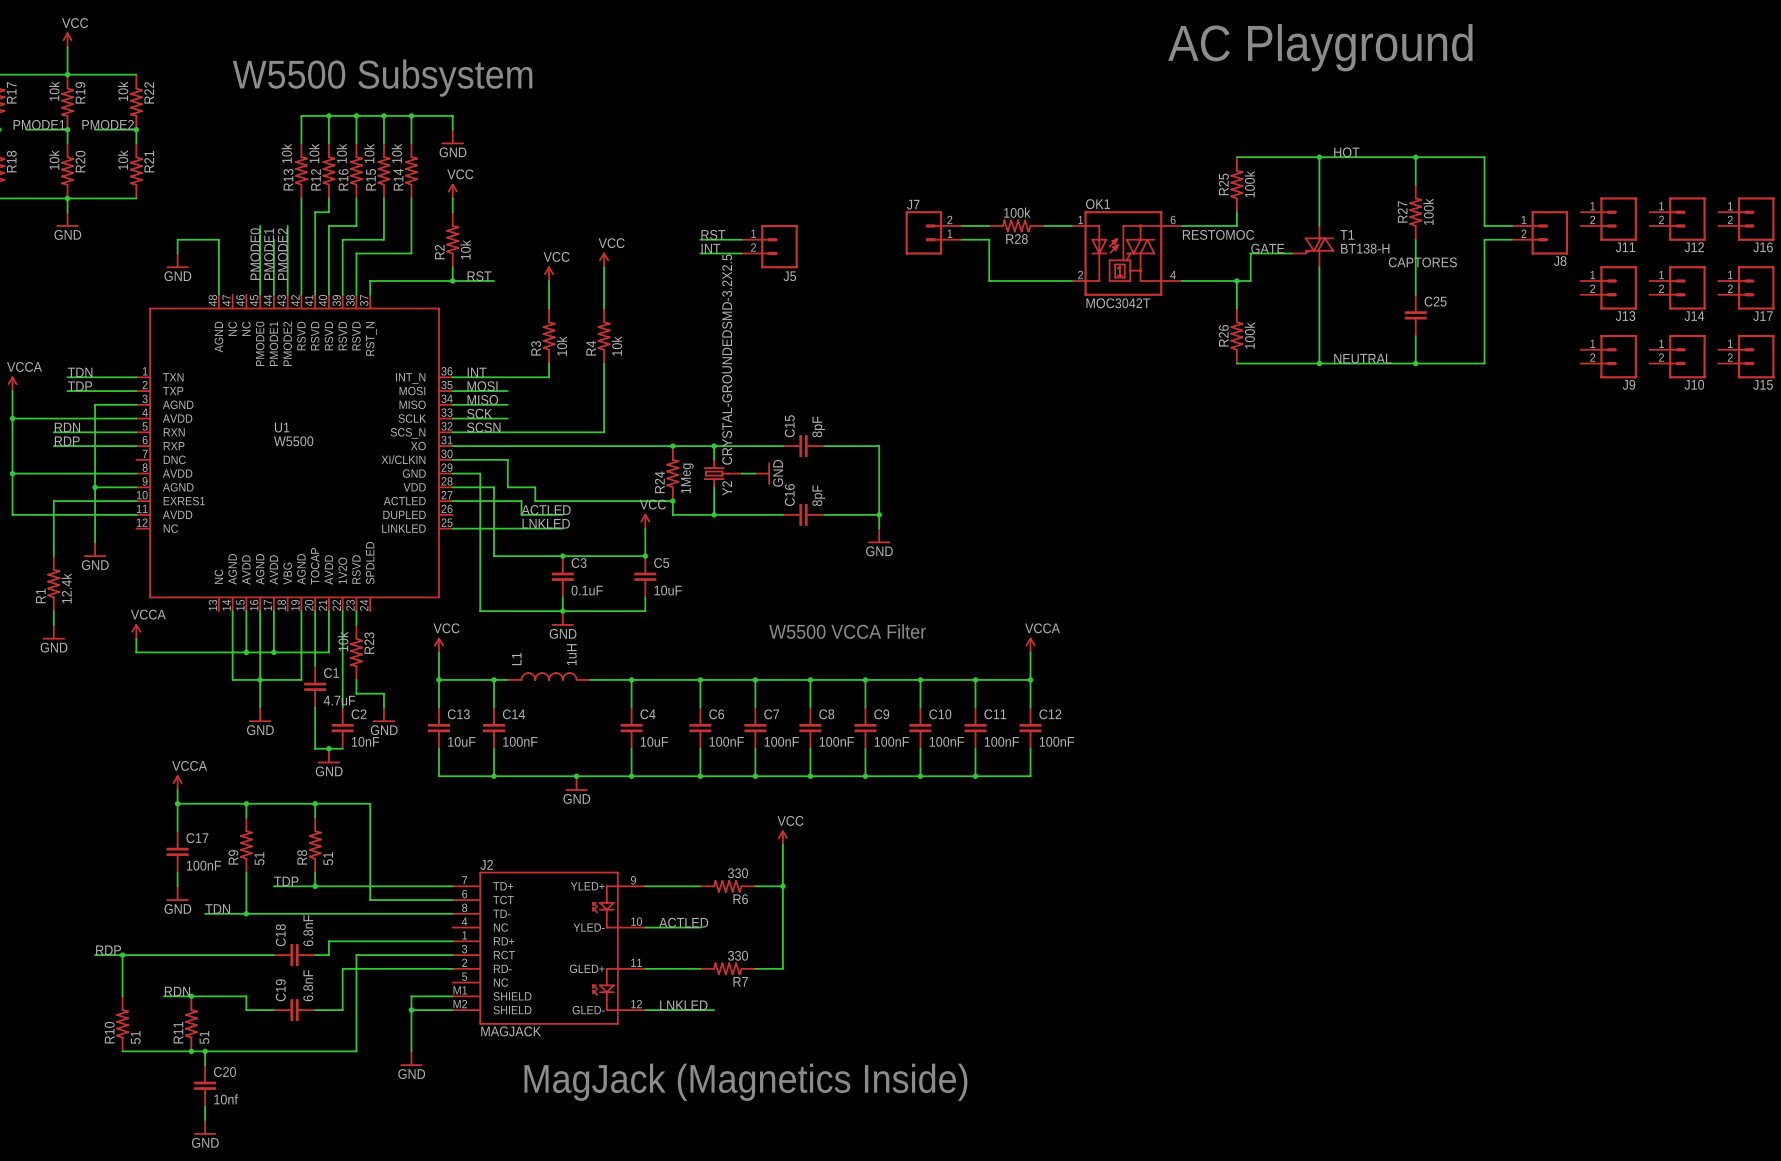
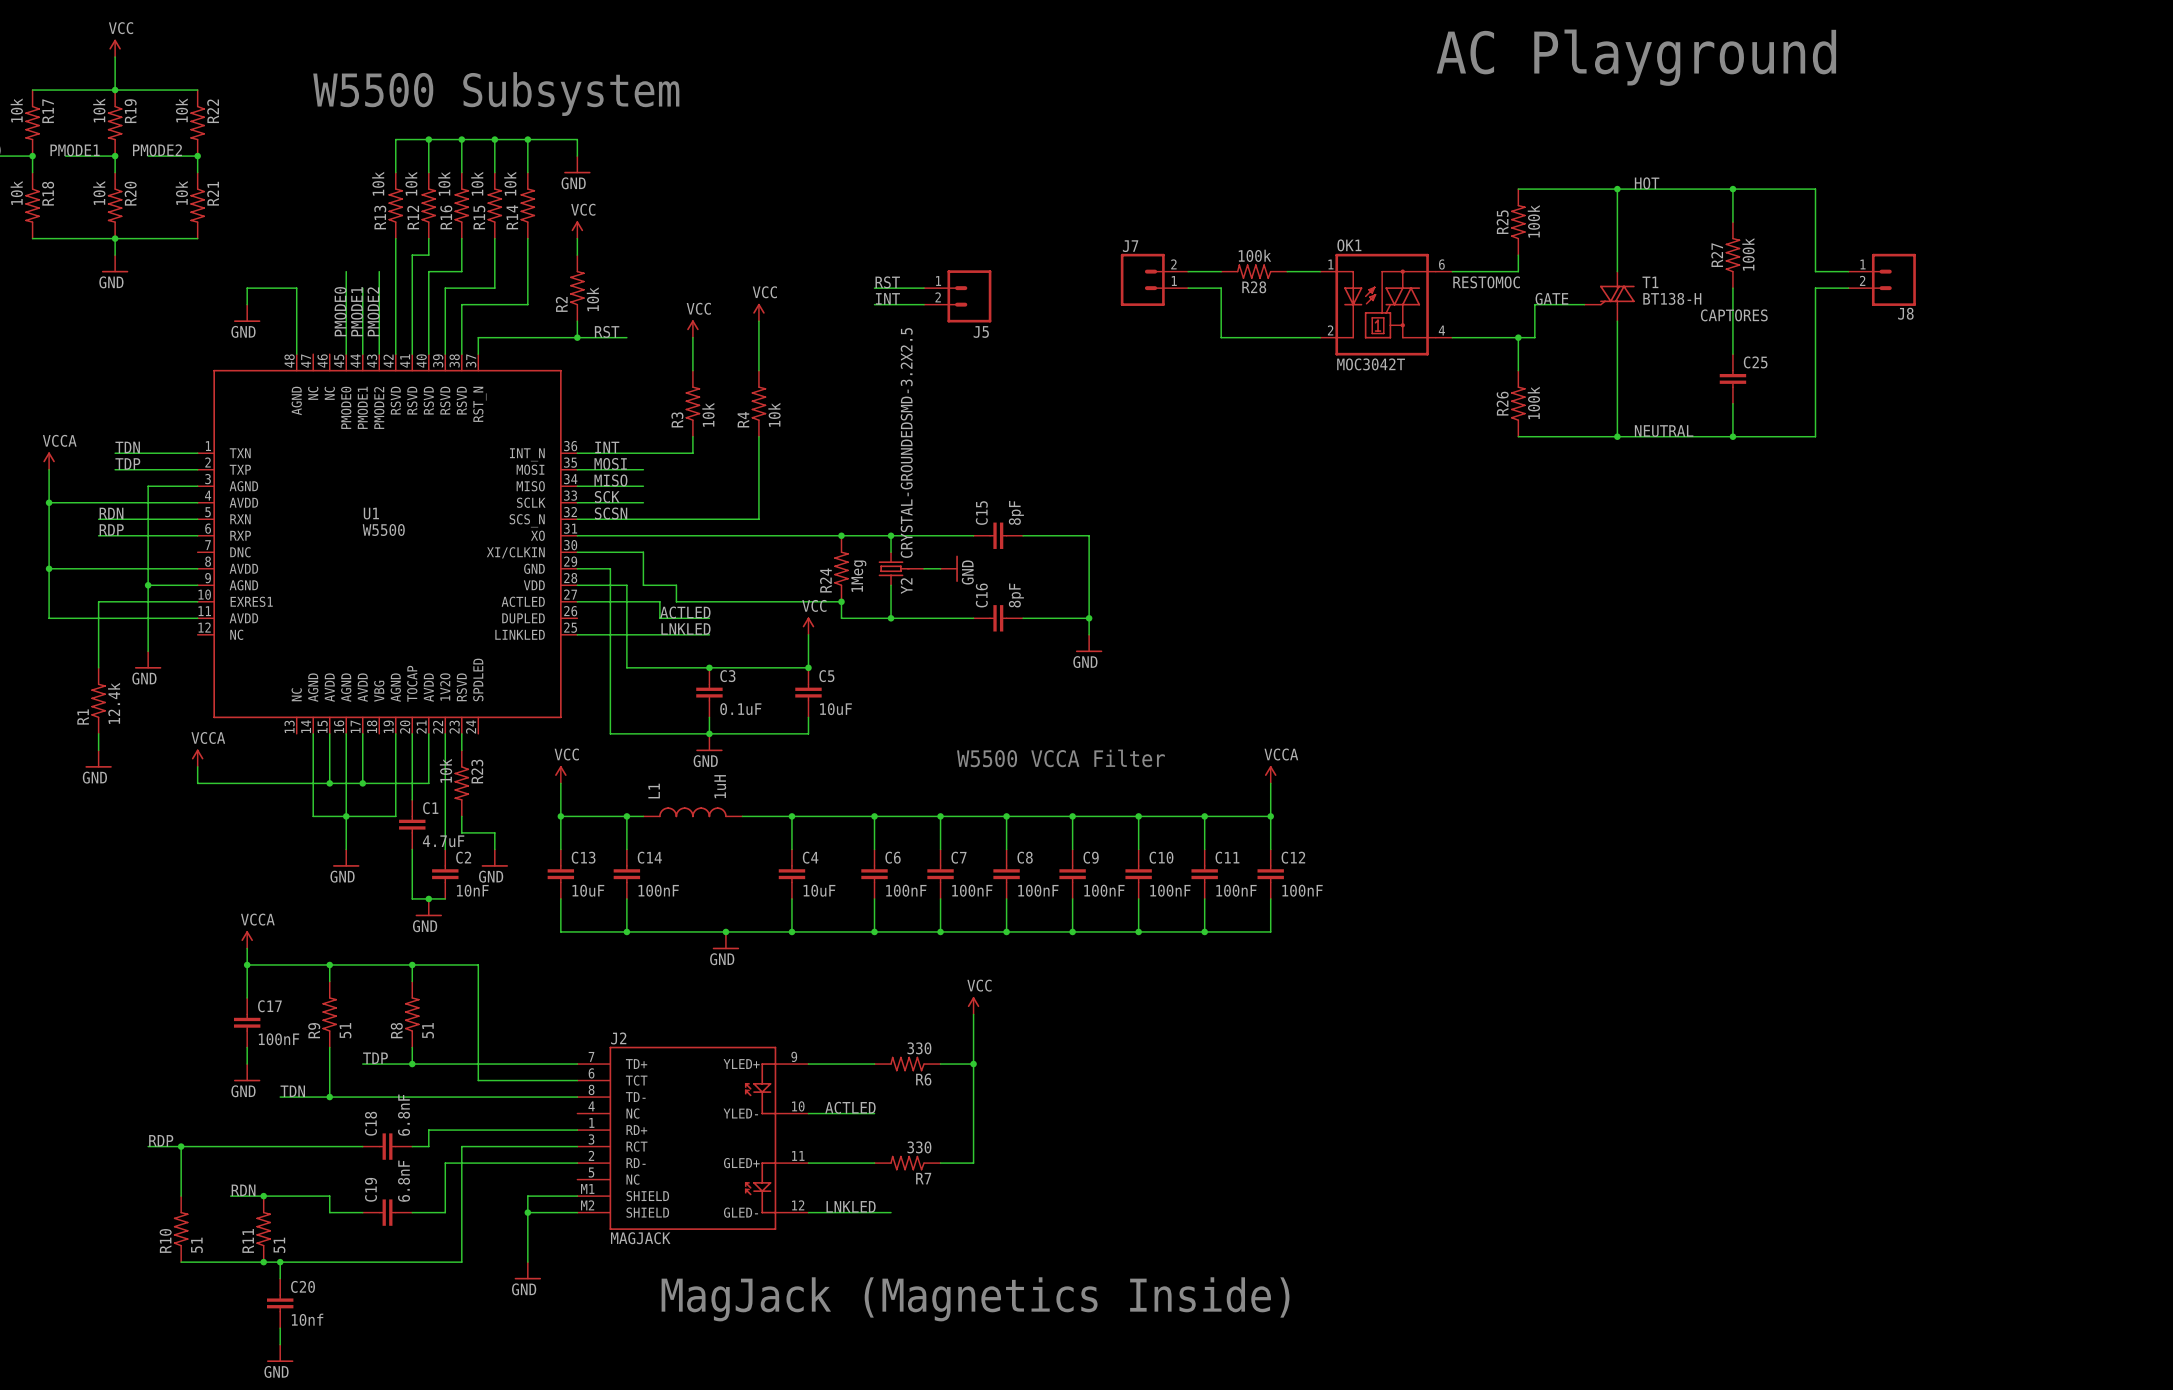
J11: (1608, 219) -> none
J12: (1677, 219) -> none
J16: (1746, 219) -> none
J13: (1608, 287) -> none
J14: (1677, 287) -> none
J17: (1746, 287) -> none
J9: (1608, 356) -> none
J10: (1677, 356) -> none
J15: (1746, 356) -> none

